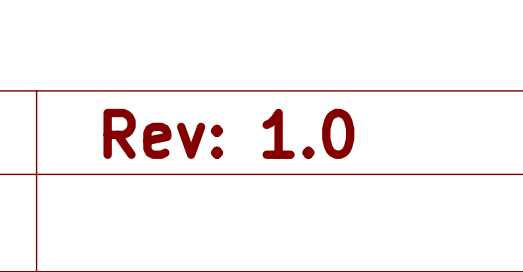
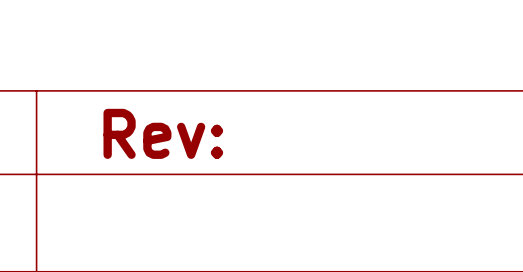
title block: Rev: 1.0 (228, 133) -> Rev: (163, 133)

